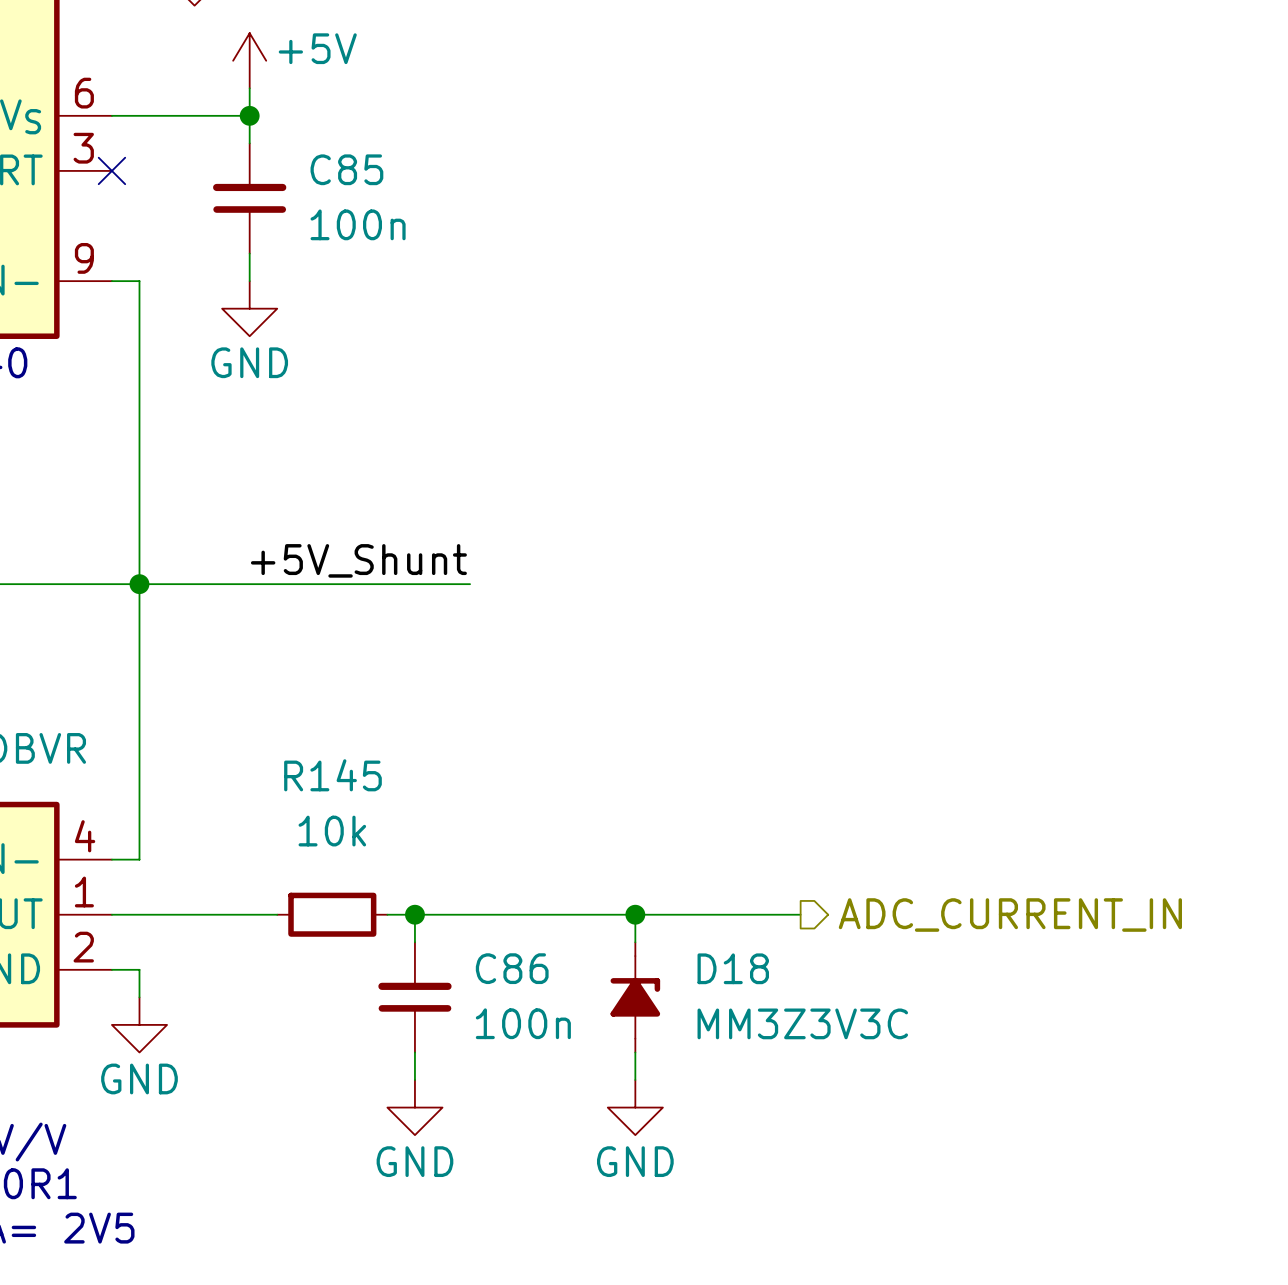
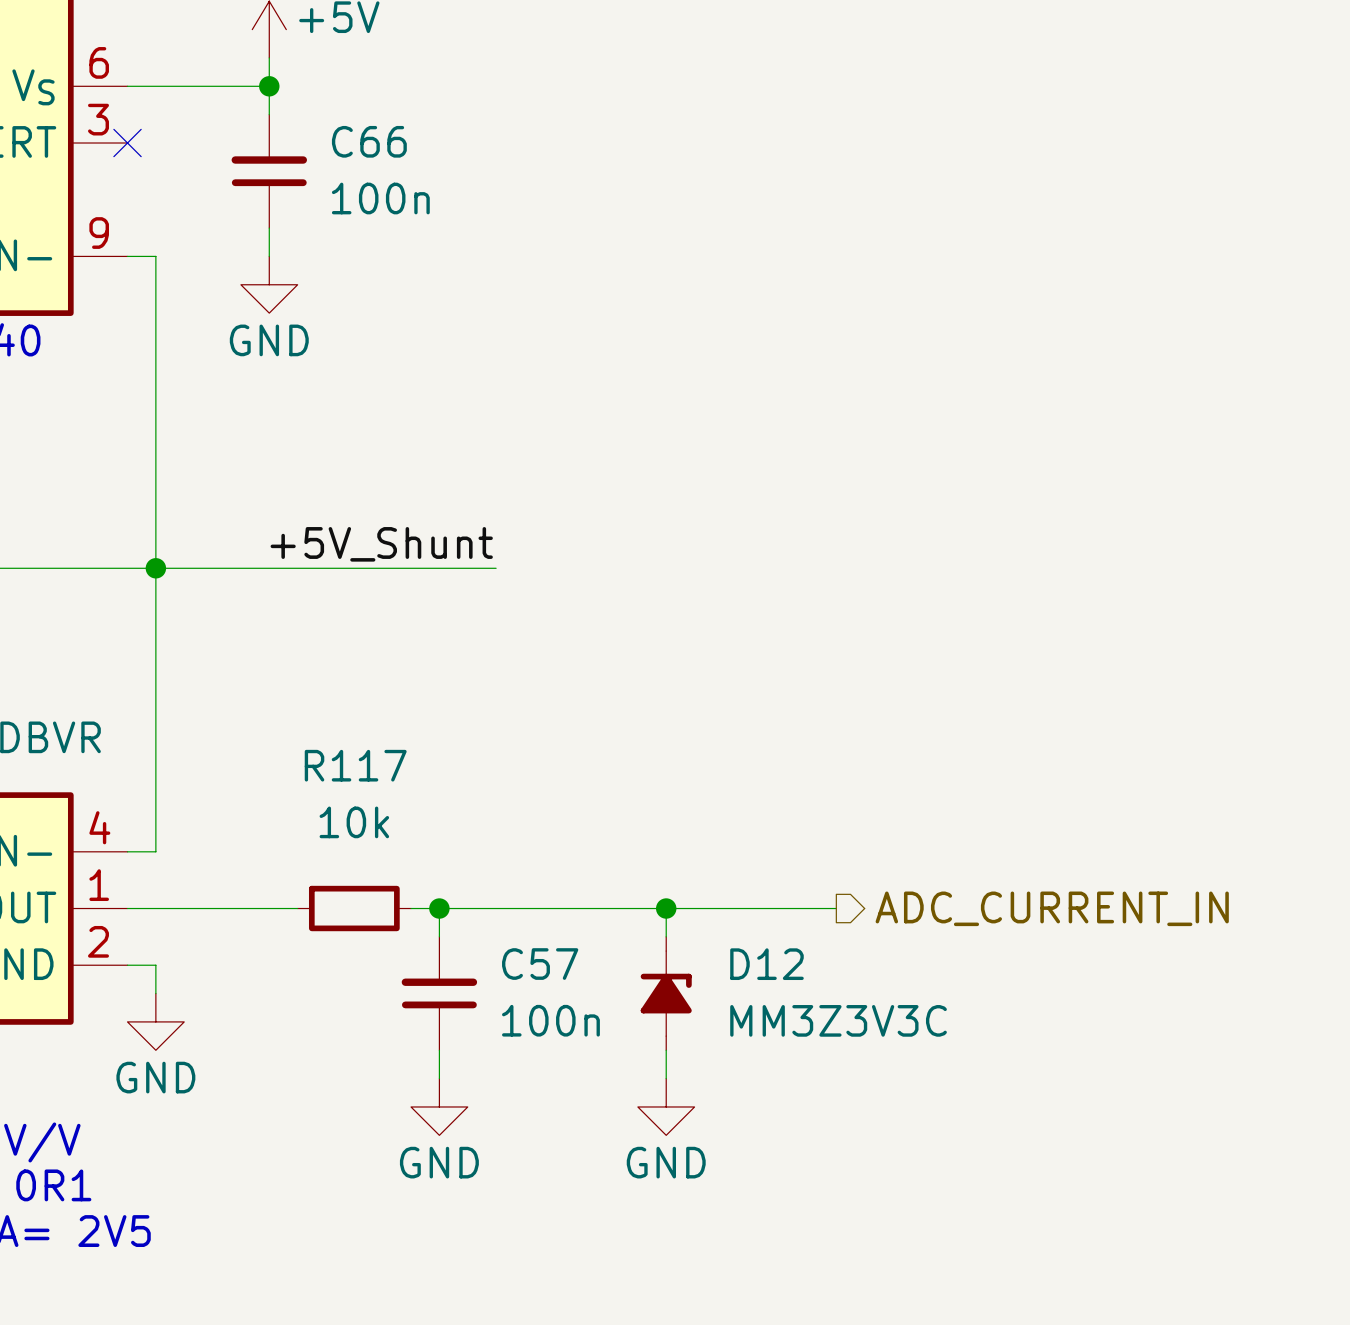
C85 name: C85 (346, 169) -> C66 (369, 141)
R145 name: R145 (332, 775) -> R117 (355, 765)
C86 name: C86 (512, 968) -> C57 (540, 964)
D18 name: D18 (733, 968) -> D12 (766, 964)

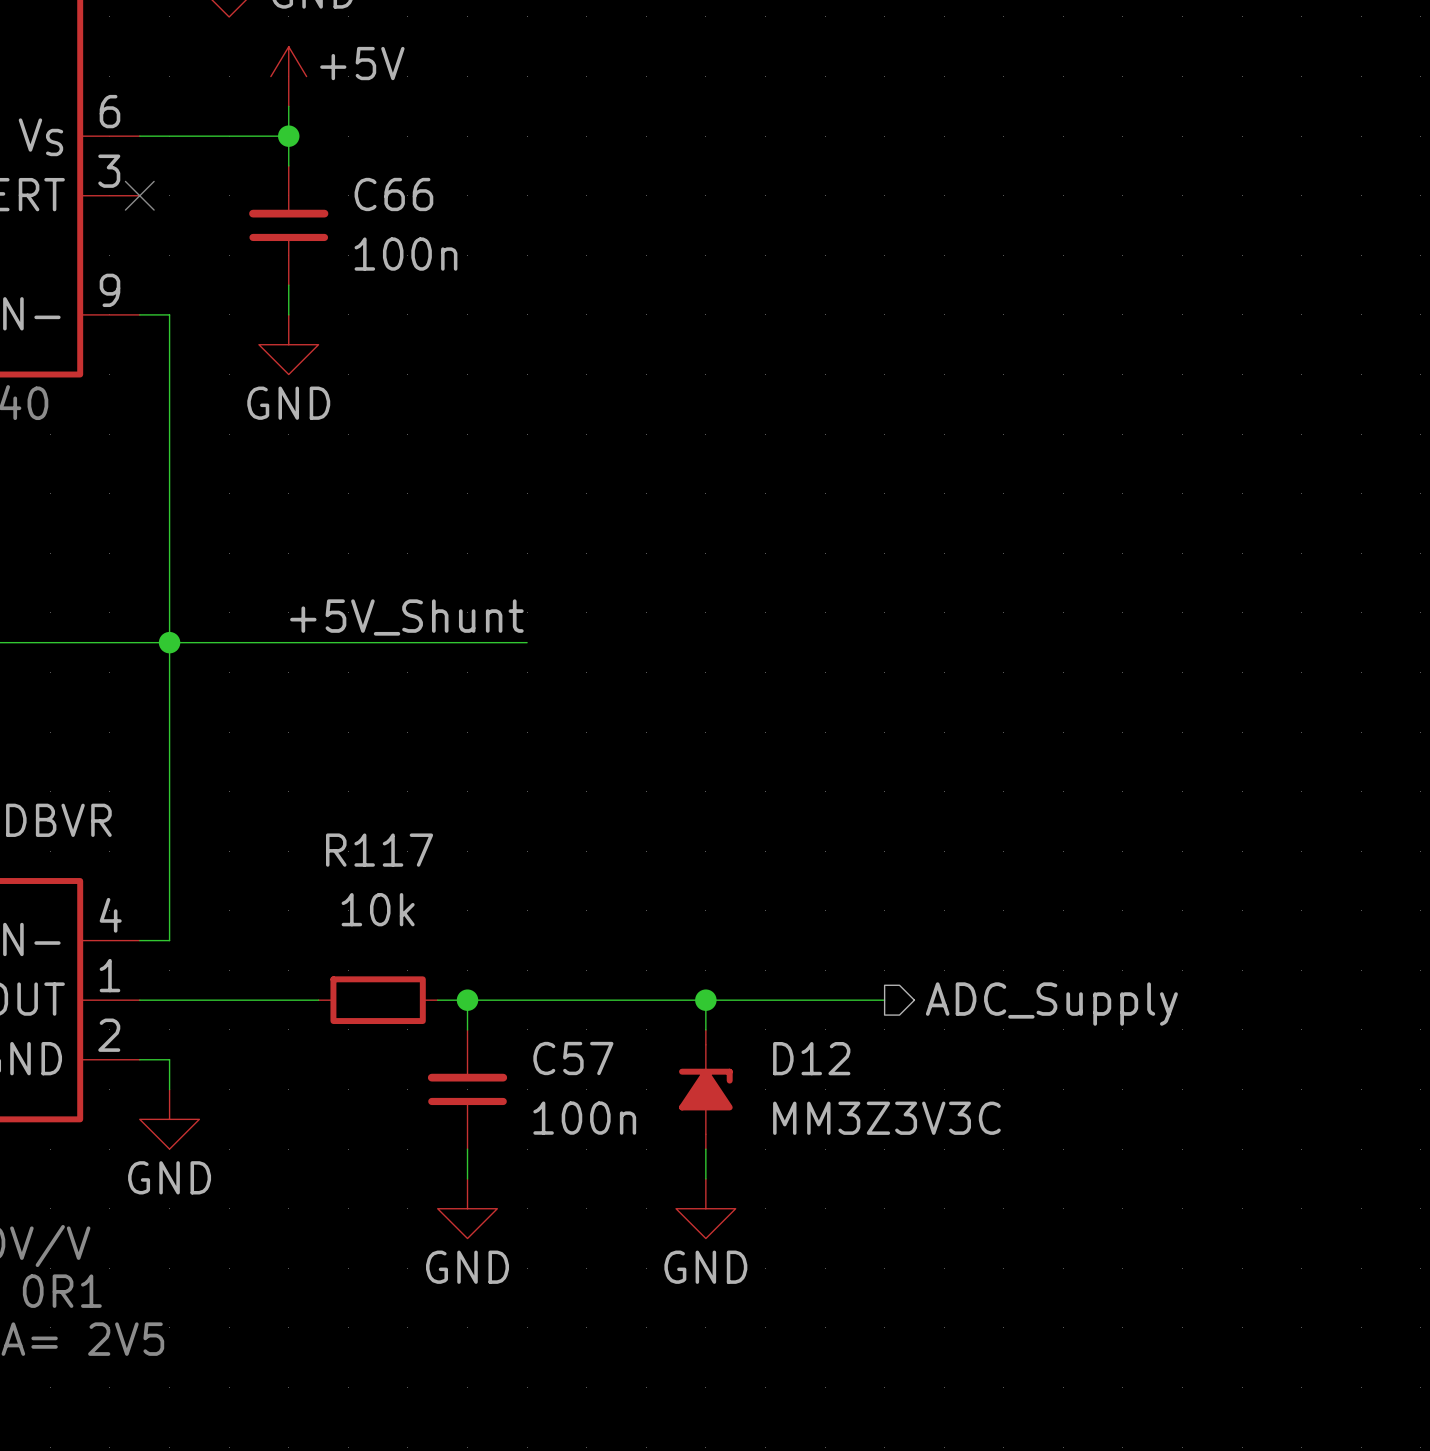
hierarchical label: ADC_CURRENT_IN (1052, 908) -> ADC_Supply (1051, 1004)

